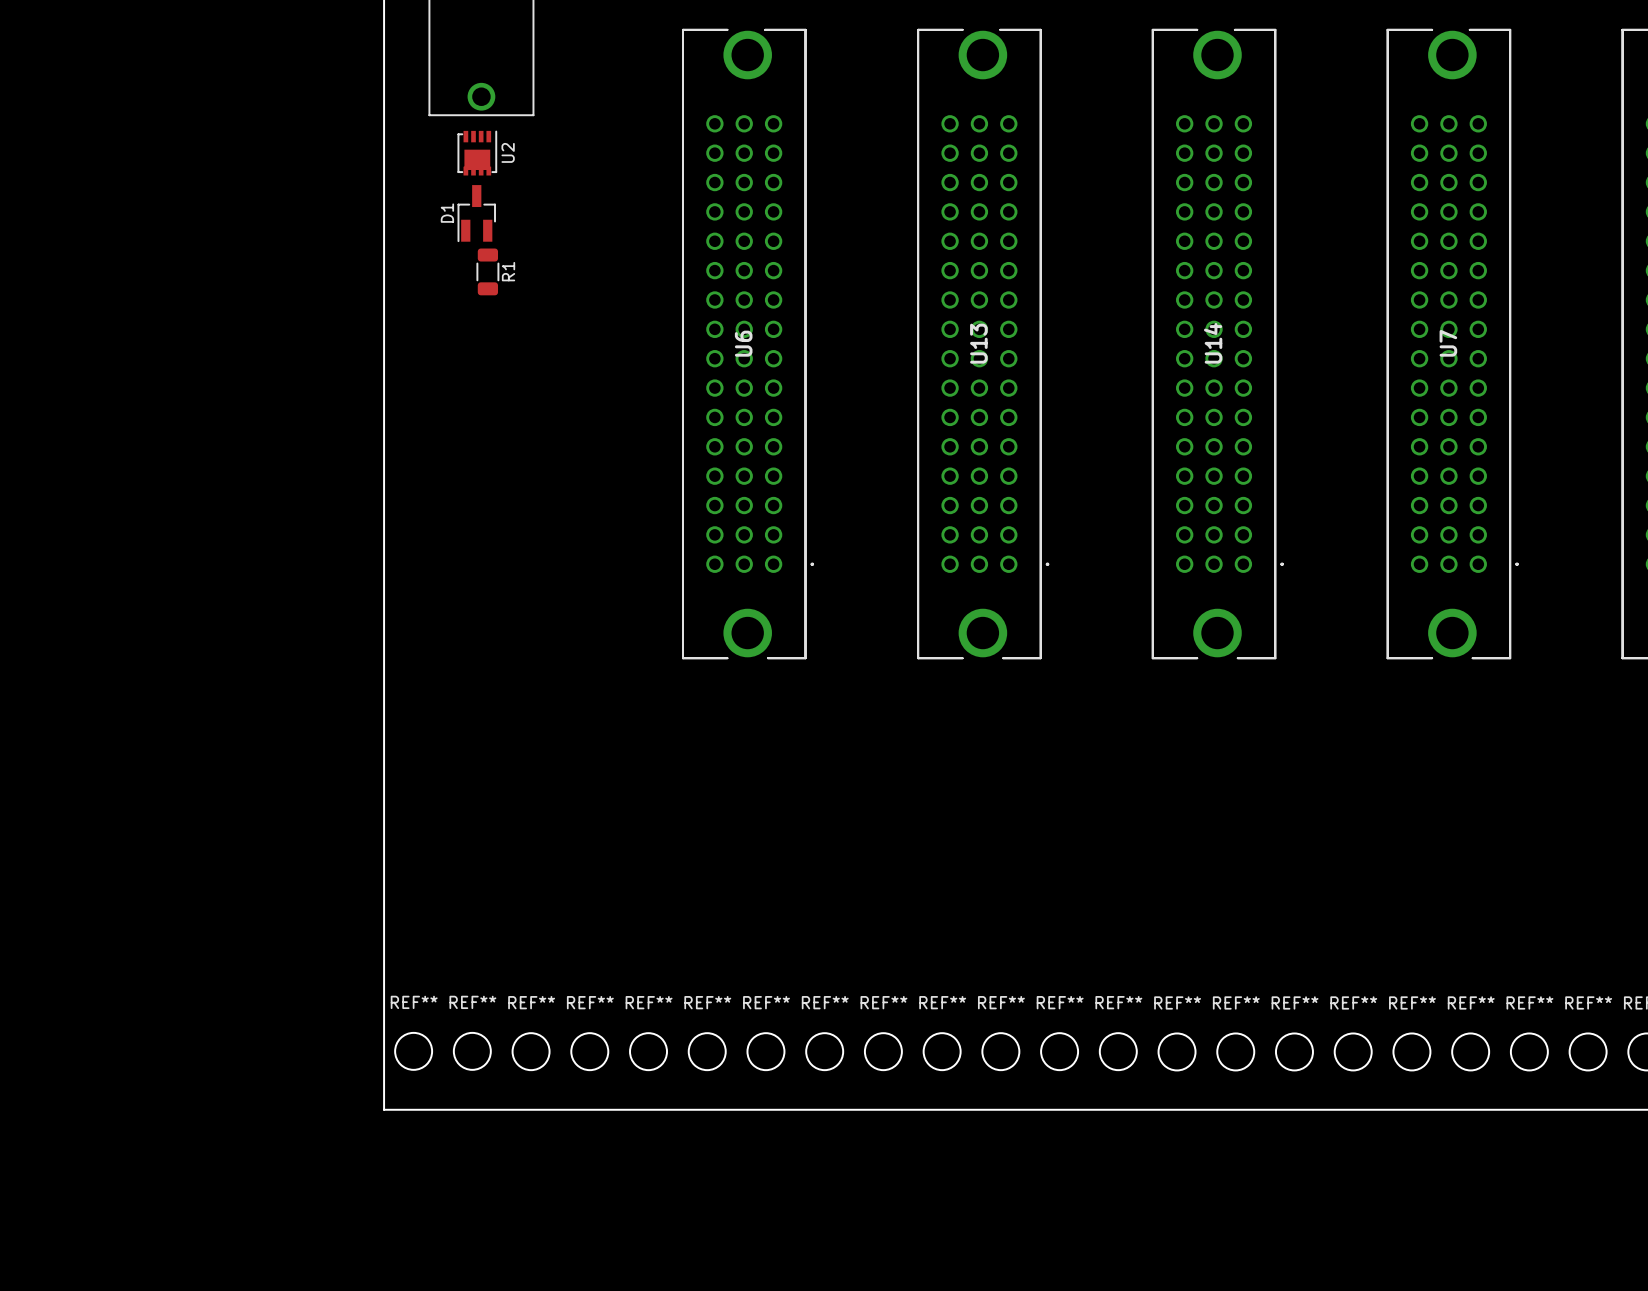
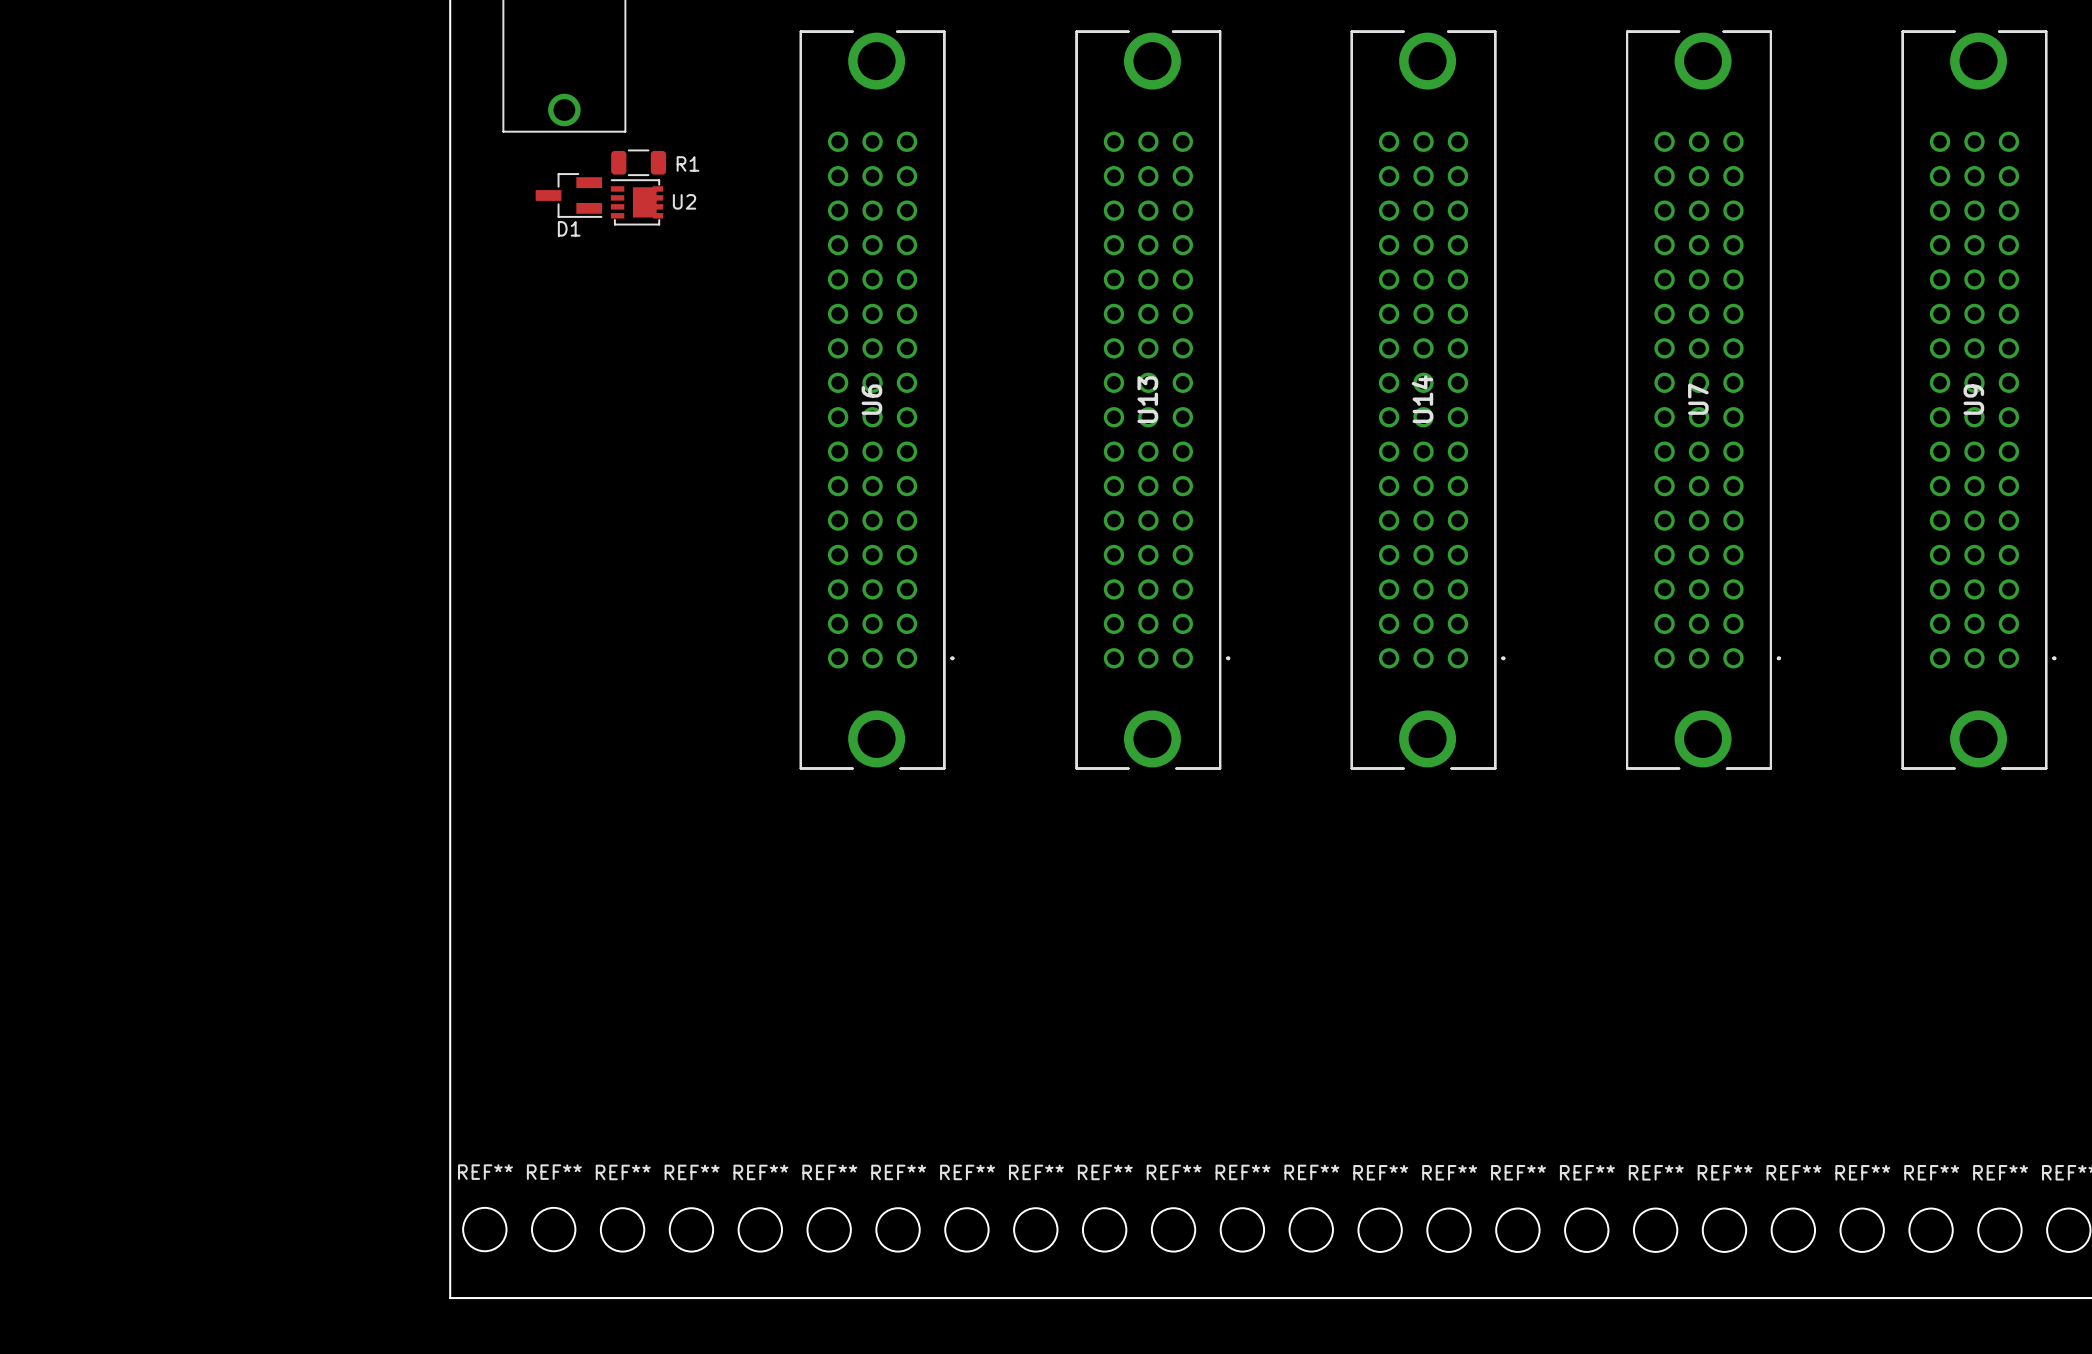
U2 rotation: 0° (477, 153) -> 90° counterclockwise (637, 202)
U2 position: (477, 153) -> (637, 202)
D1 rotation: 0° (476, 213) -> 90° counterclockwise (568, 195)
D1 position: (476, 213) -> (568, 195)
R1 rotation: 0° (487, 271) -> 90° clockwise (638, 162)
R1 position: (487, 271) -> (638, 162)

